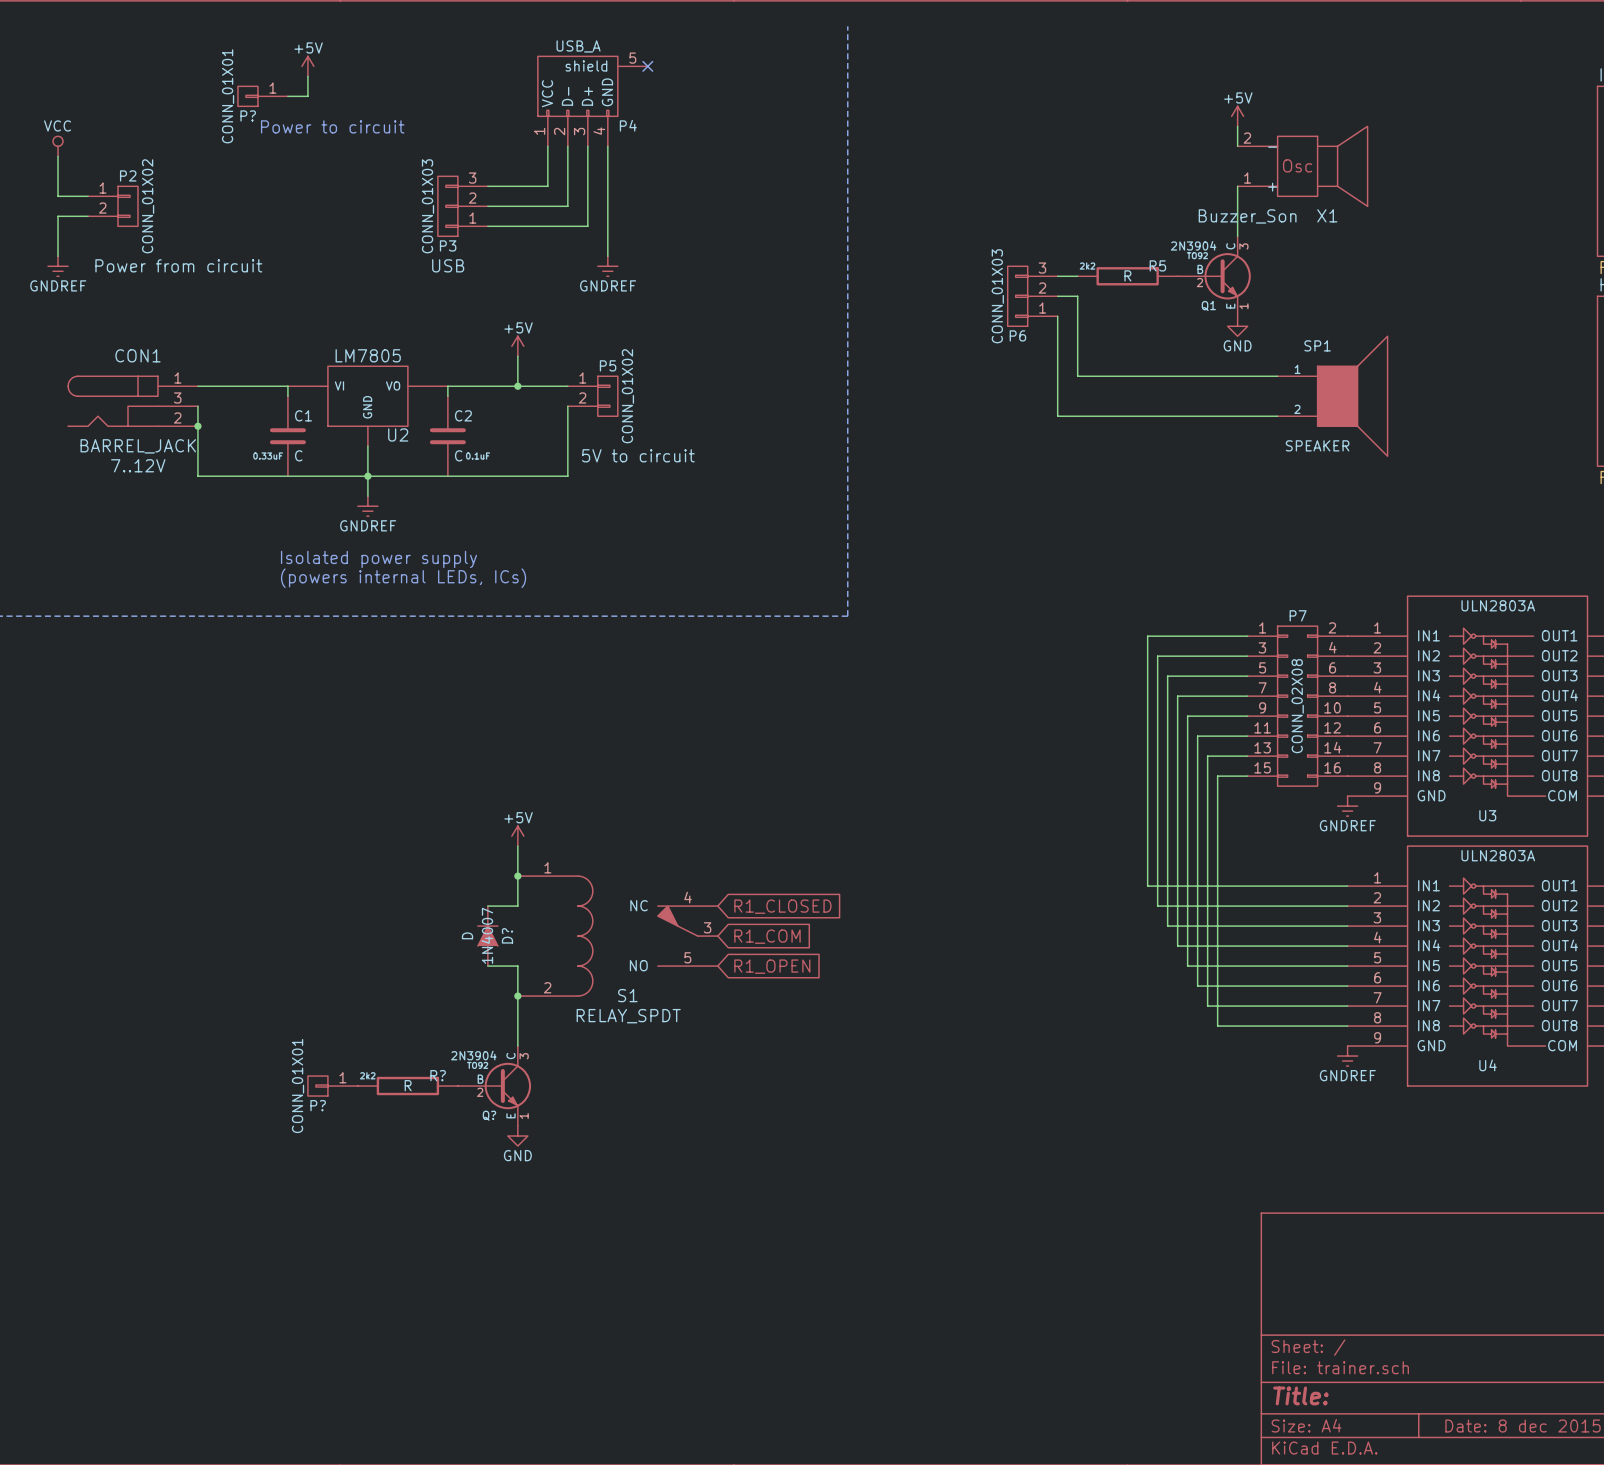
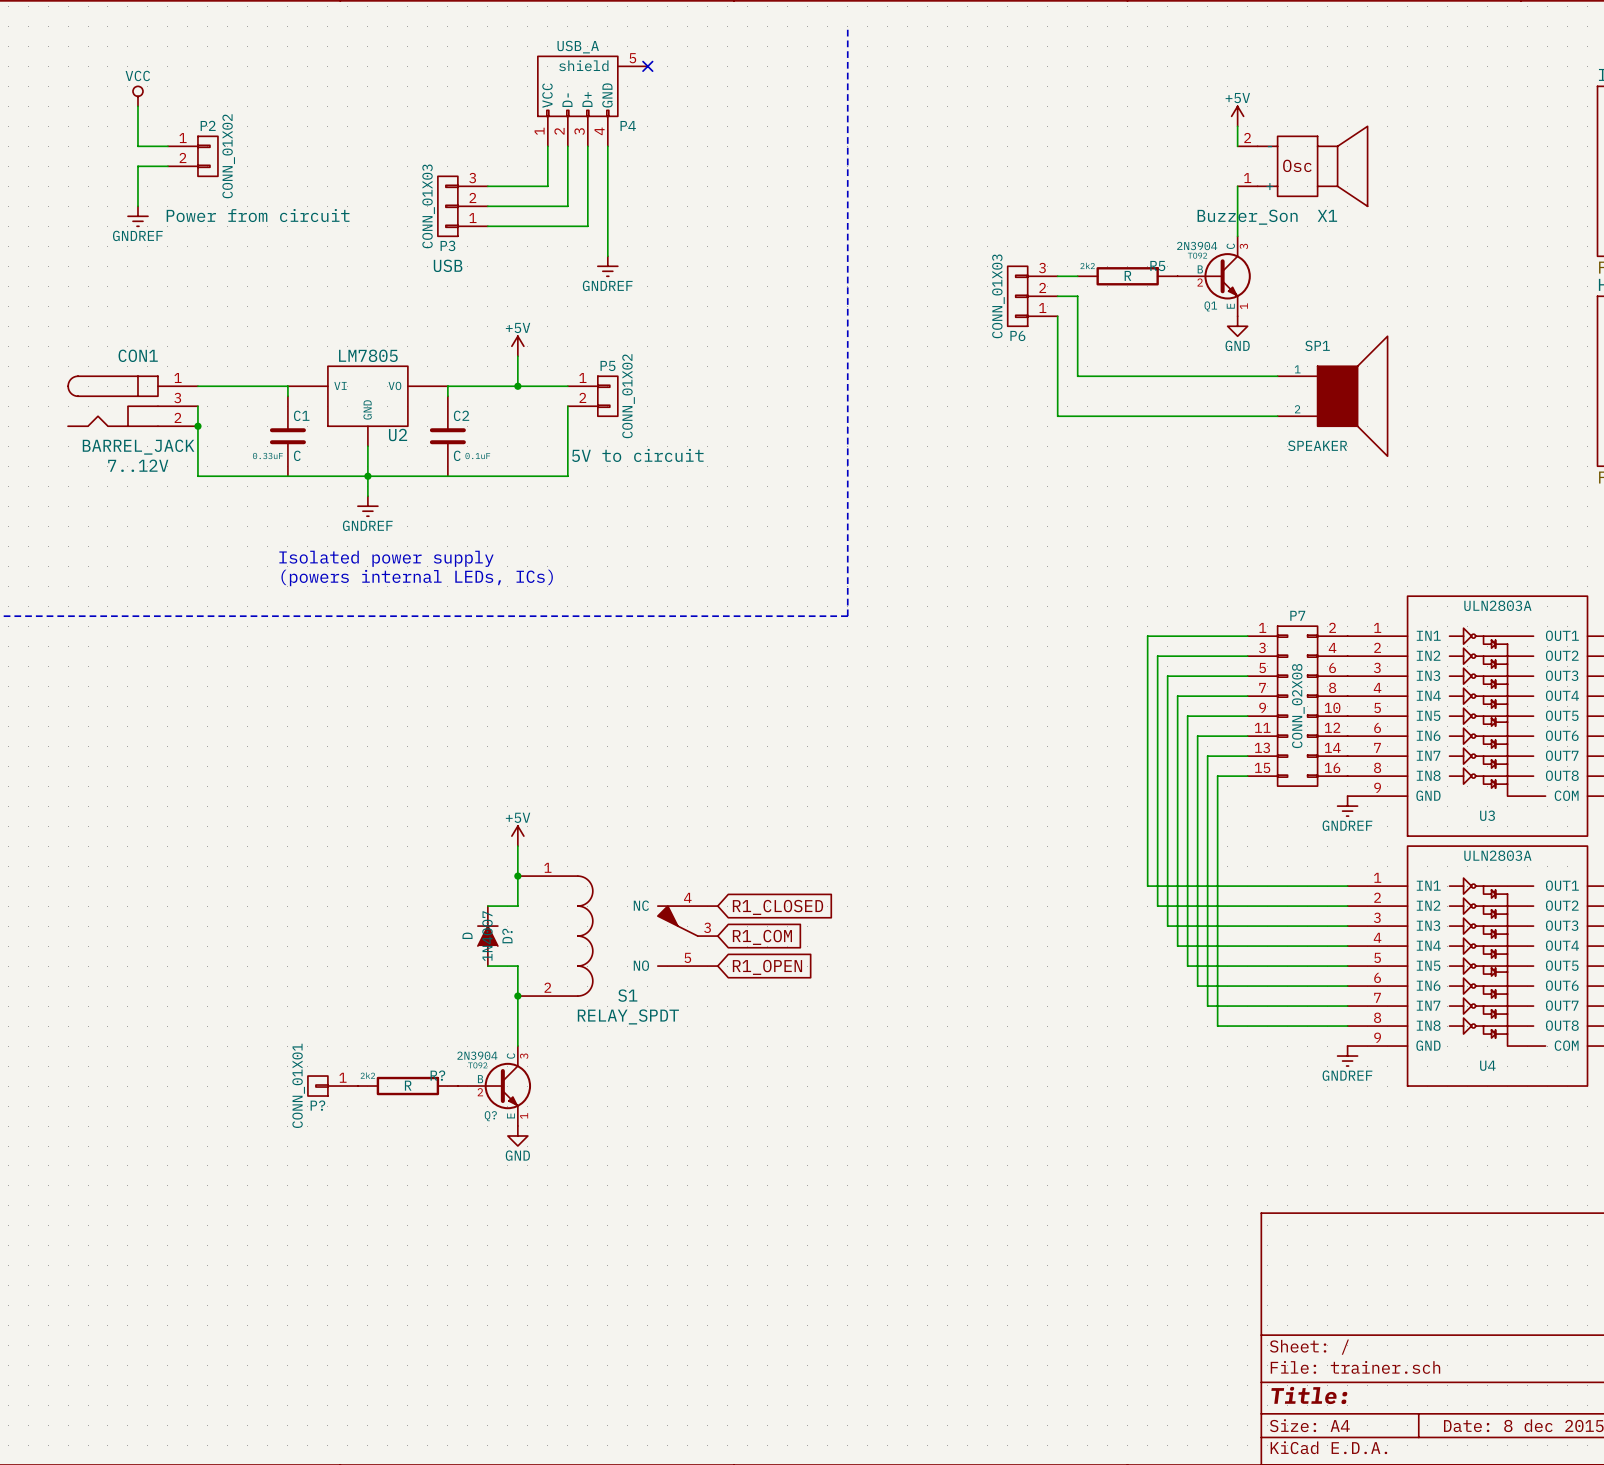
power symbol: +5V (307, 66) -> none
wire: (307, 76) (307, 96) (287, 96) -> none
P?: CONN_01X01 (262, 96) -> none
text: Power to circuit (332, 126) -> none
power symbol position: VCC (58, 146) -> VCC (137, 96)
wire: (58, 156) (58, 196) (88, 196) -> (137, 106) (137, 146) (167, 146)
P2 position: (112, 206) -> (192, 156)
wire: (88, 216) (58, 216) (58, 256) -> (167, 166) (137, 166) (137, 206)
power symbol position: GNDREF (58, 266) -> GNDREF (137, 216)

